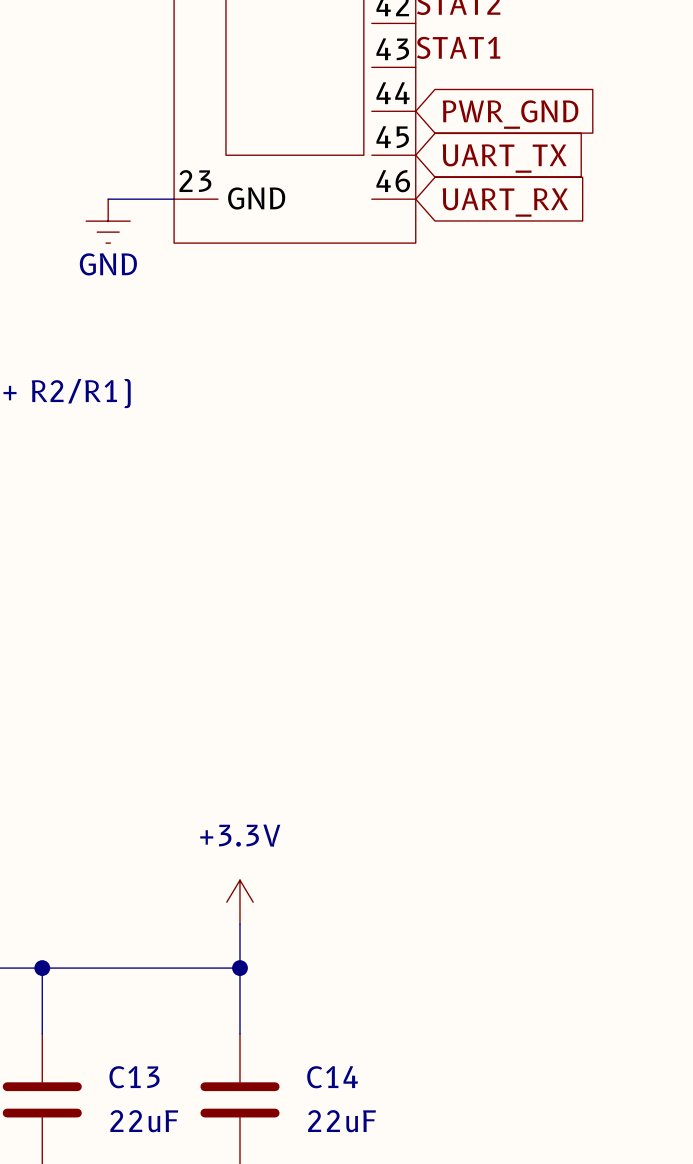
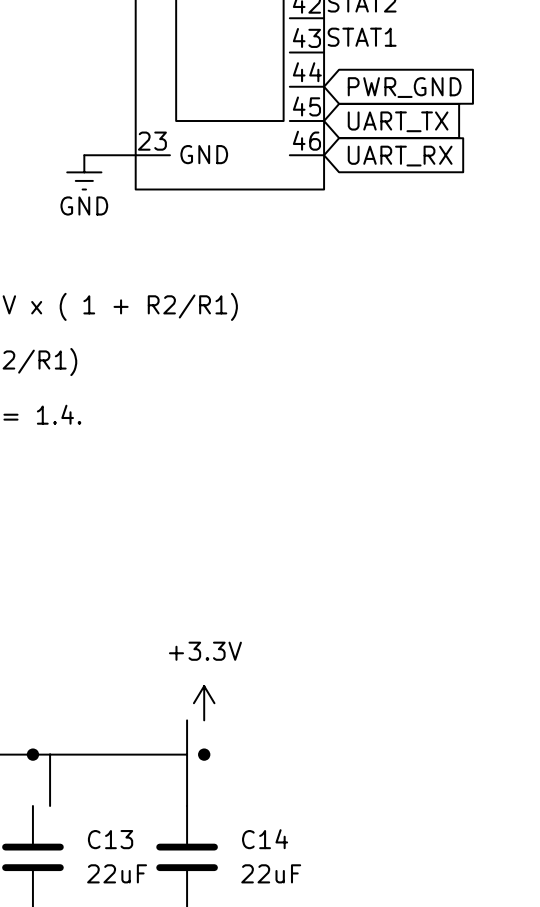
power symbol position: +3.3V (239, 902) -> +3.3V (204, 703)
wire: (42, 968) (42, 1033) -> (50, 754) (50, 805)
junction position: (239, 968) -> (204, 754)

